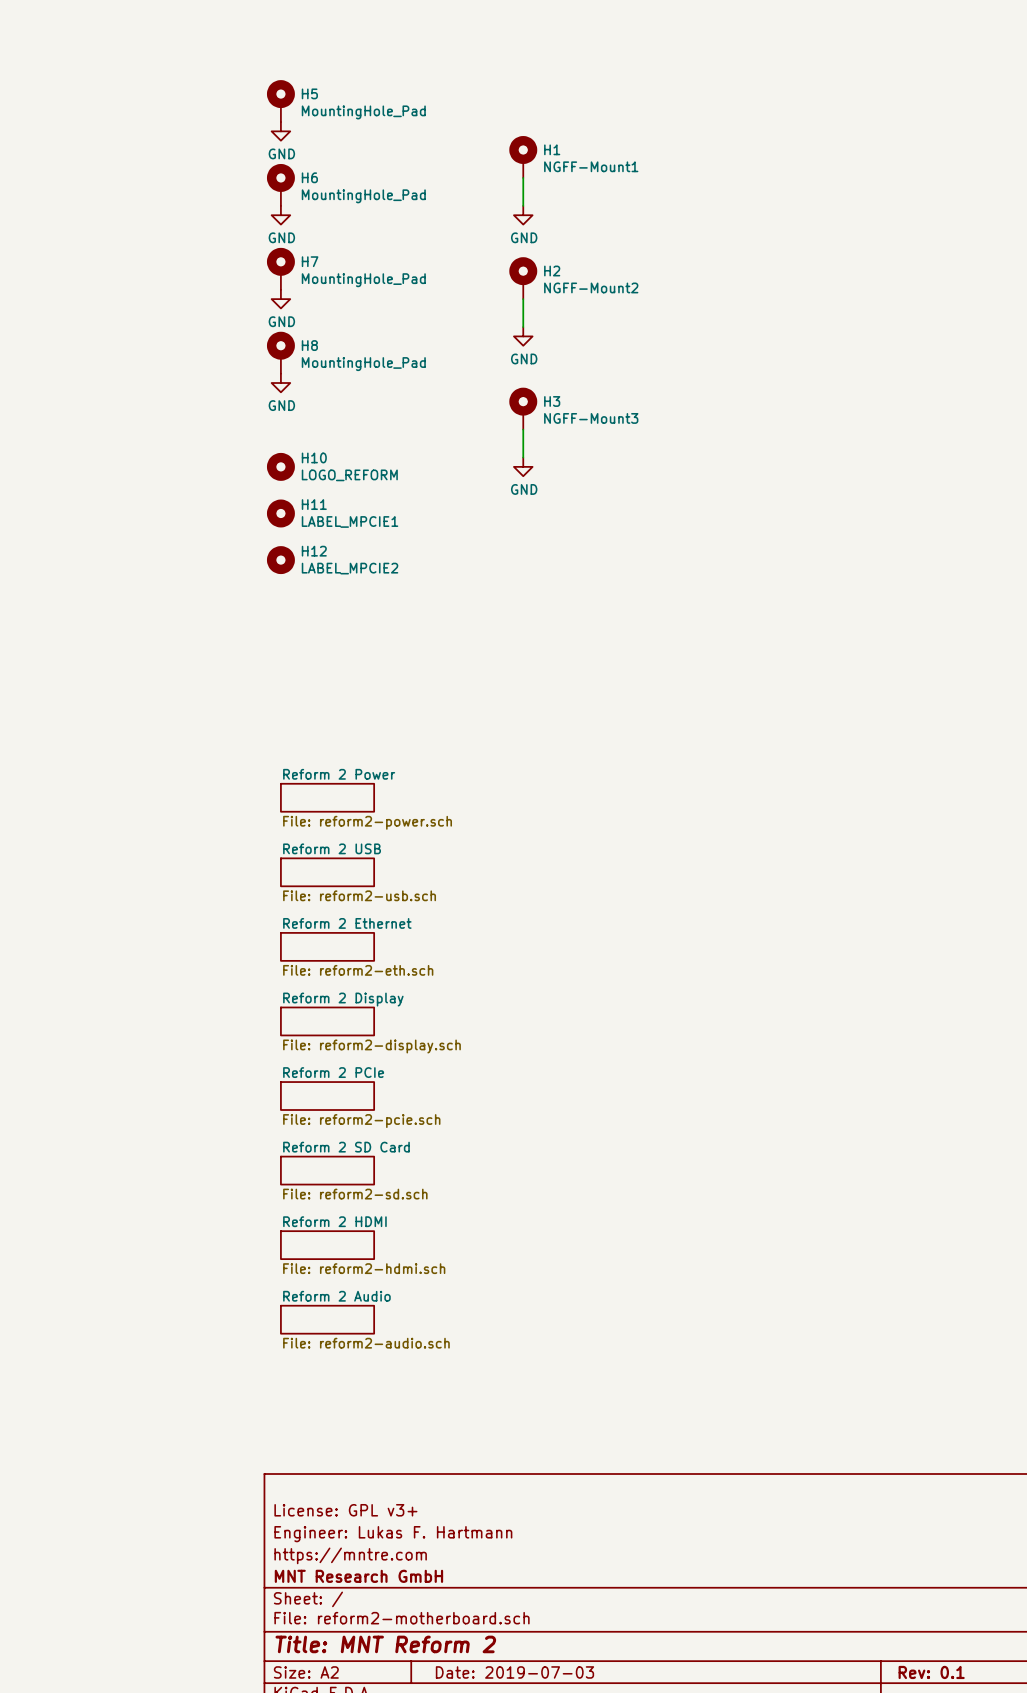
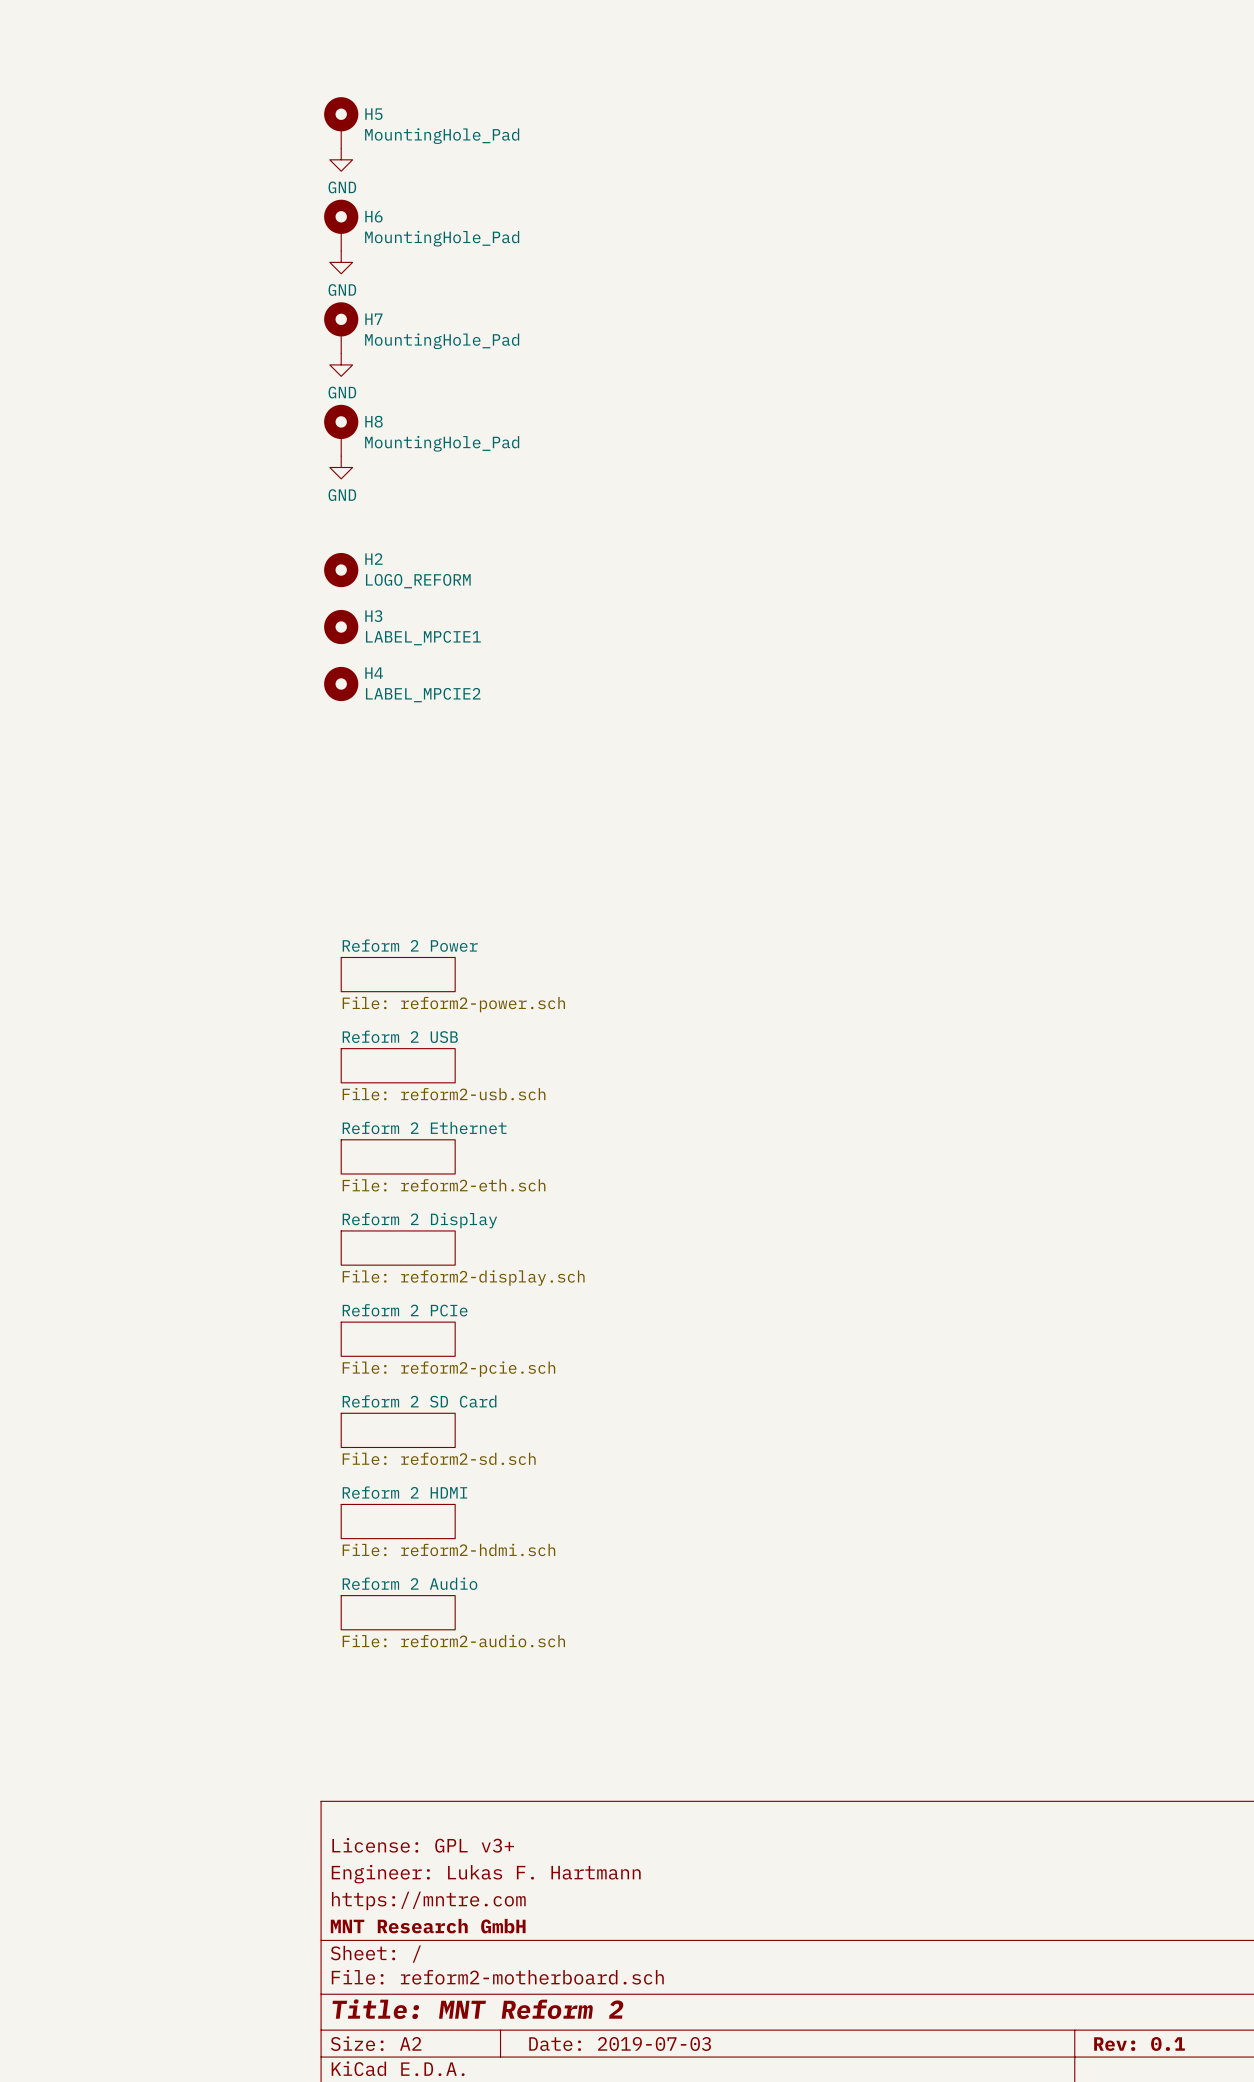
H1: NGFF-Mount1 (523, 156) -> none
wire: (523, 177) (523, 205) -> none
power symbol: GND (523, 215) -> none
H2: NGFF-Mount2 (523, 278) -> none
wire: (523, 299) (523, 327) -> none
power symbol: GND (523, 336) -> none
H3: NGFF-Mount3 (523, 408) -> none
wire: (523, 429) (523, 457) -> none
H10 name: H10 (314, 457) -> H2 (373, 559)
power symbol: GND (523, 466) -> none
H11 name: H11 (314, 504) -> H3 (373, 616)
H12 name: H12 (314, 551) -> H4 (374, 673)

